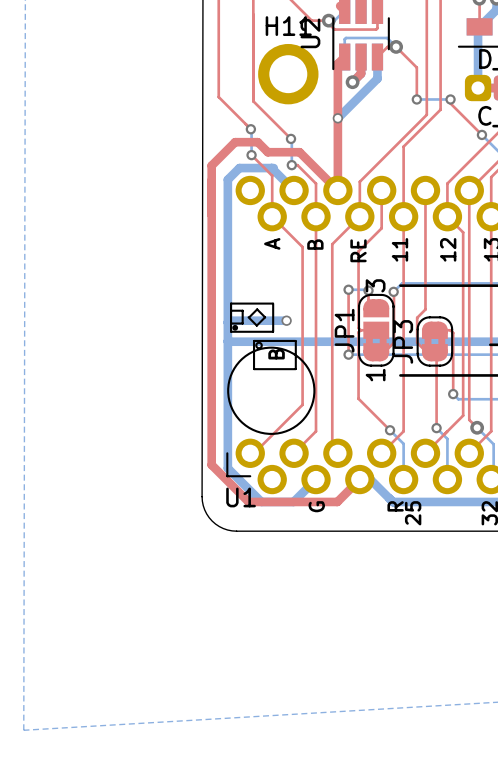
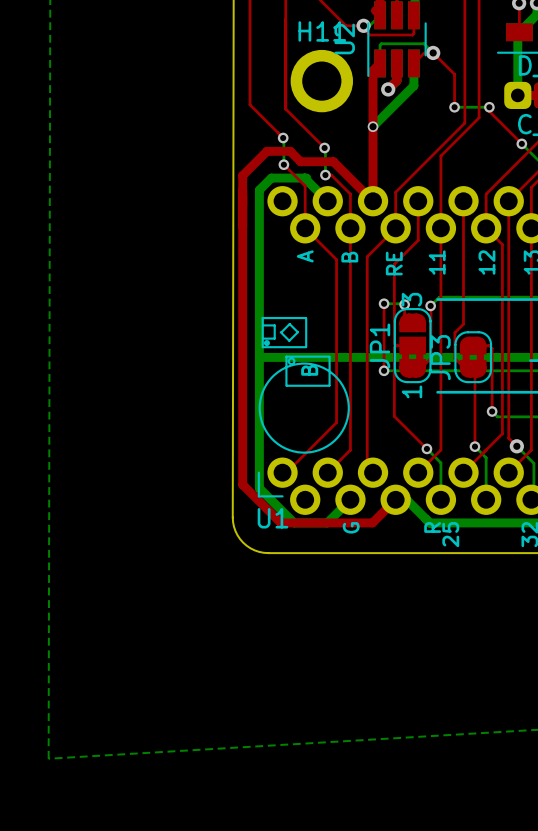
bottom track: (286, 320) (229, 320) (227, 322) -> none
via: (286, 320) -> none

